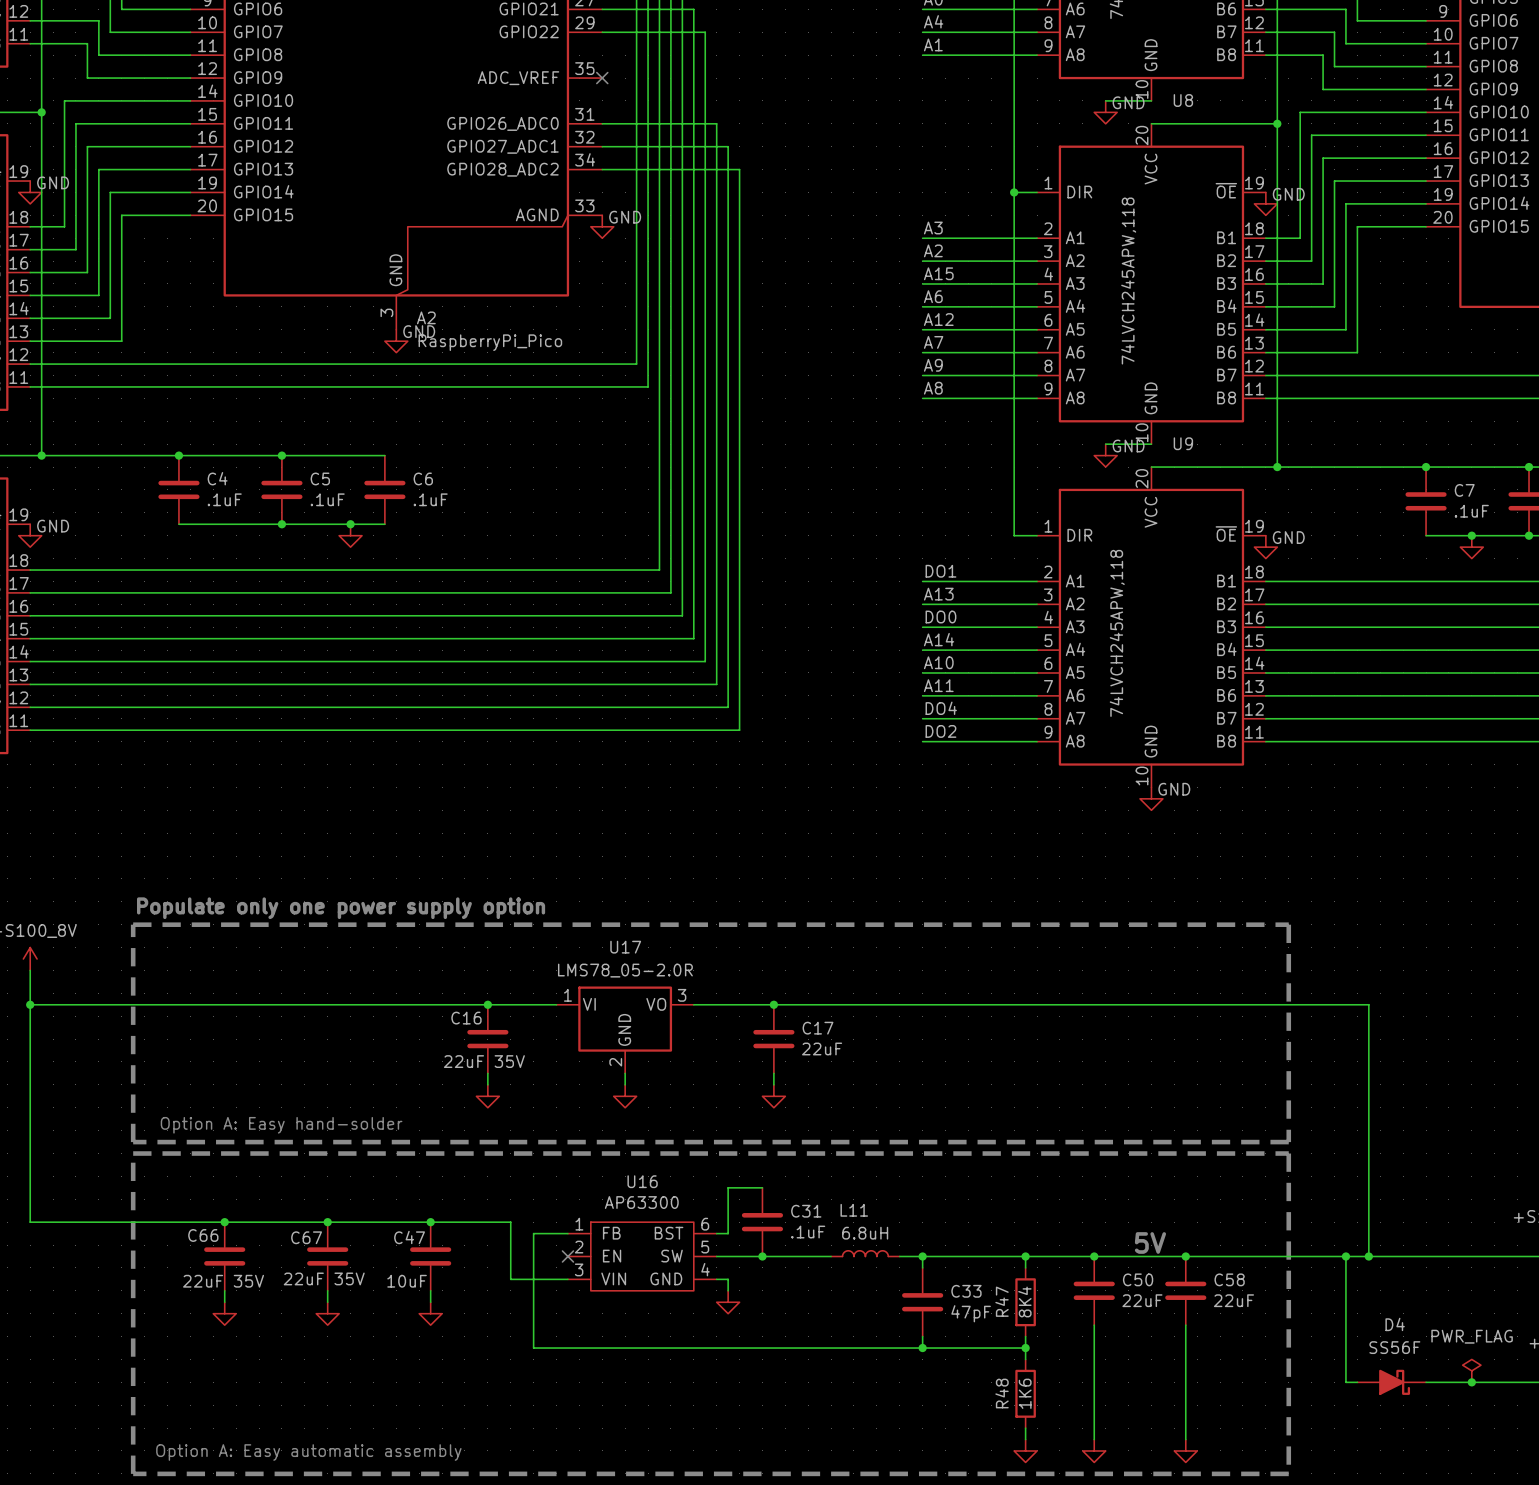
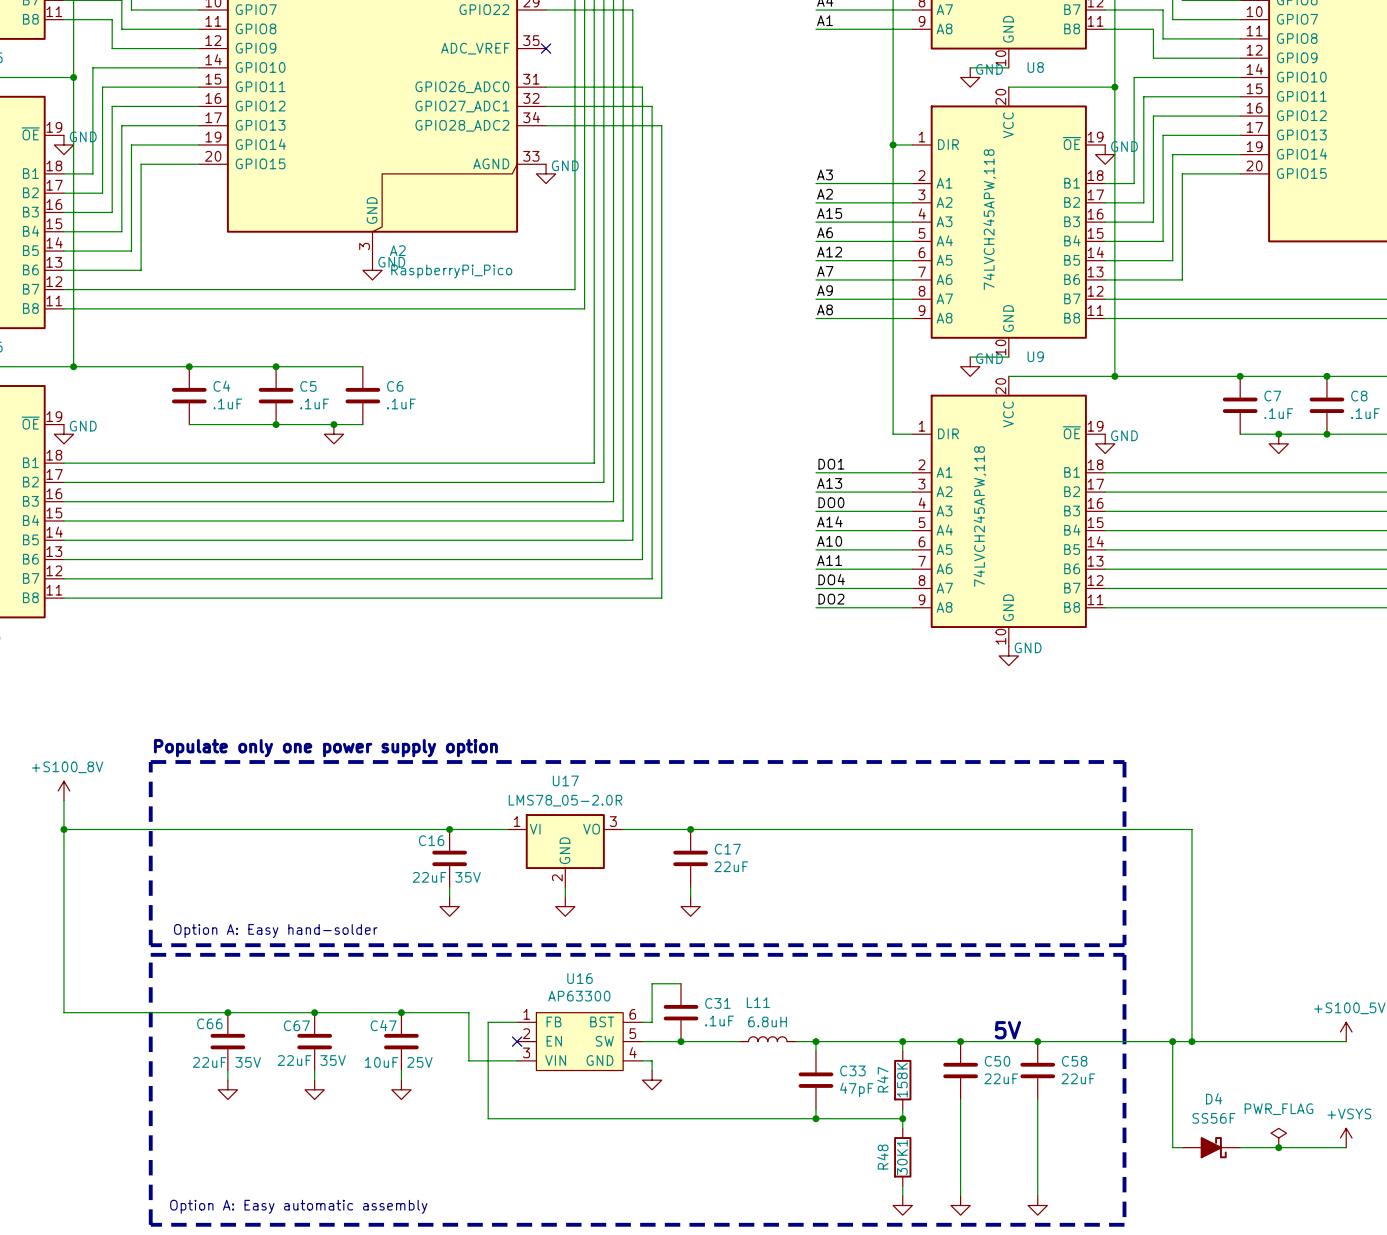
C47 value: 10uF (407, 1281) -> 10uF 25V (398, 1062)
R47 value: 8K4 (1024, 1301) -> 158K (902, 1080)
R48 value: 1K6 (1025, 1393) -> 30K1 (902, 1157)

